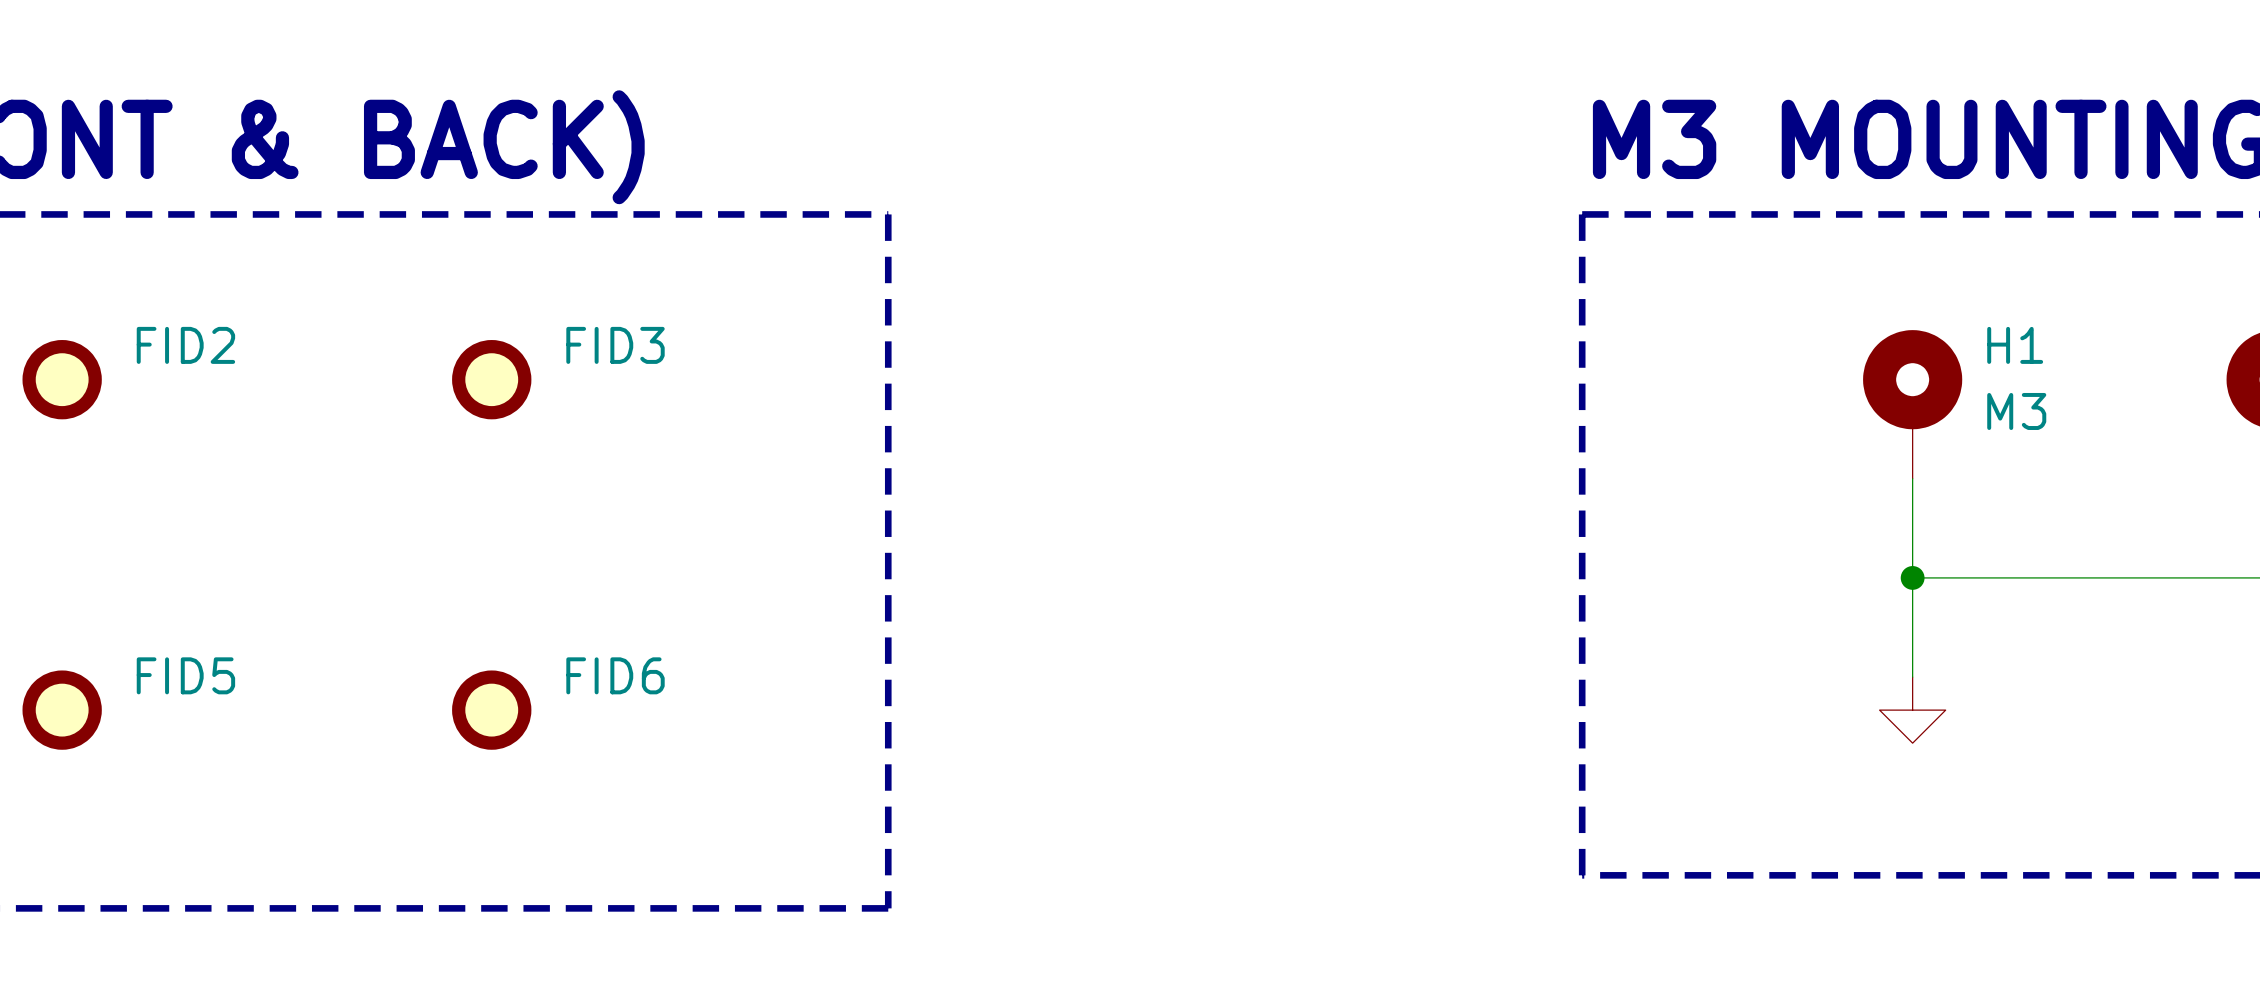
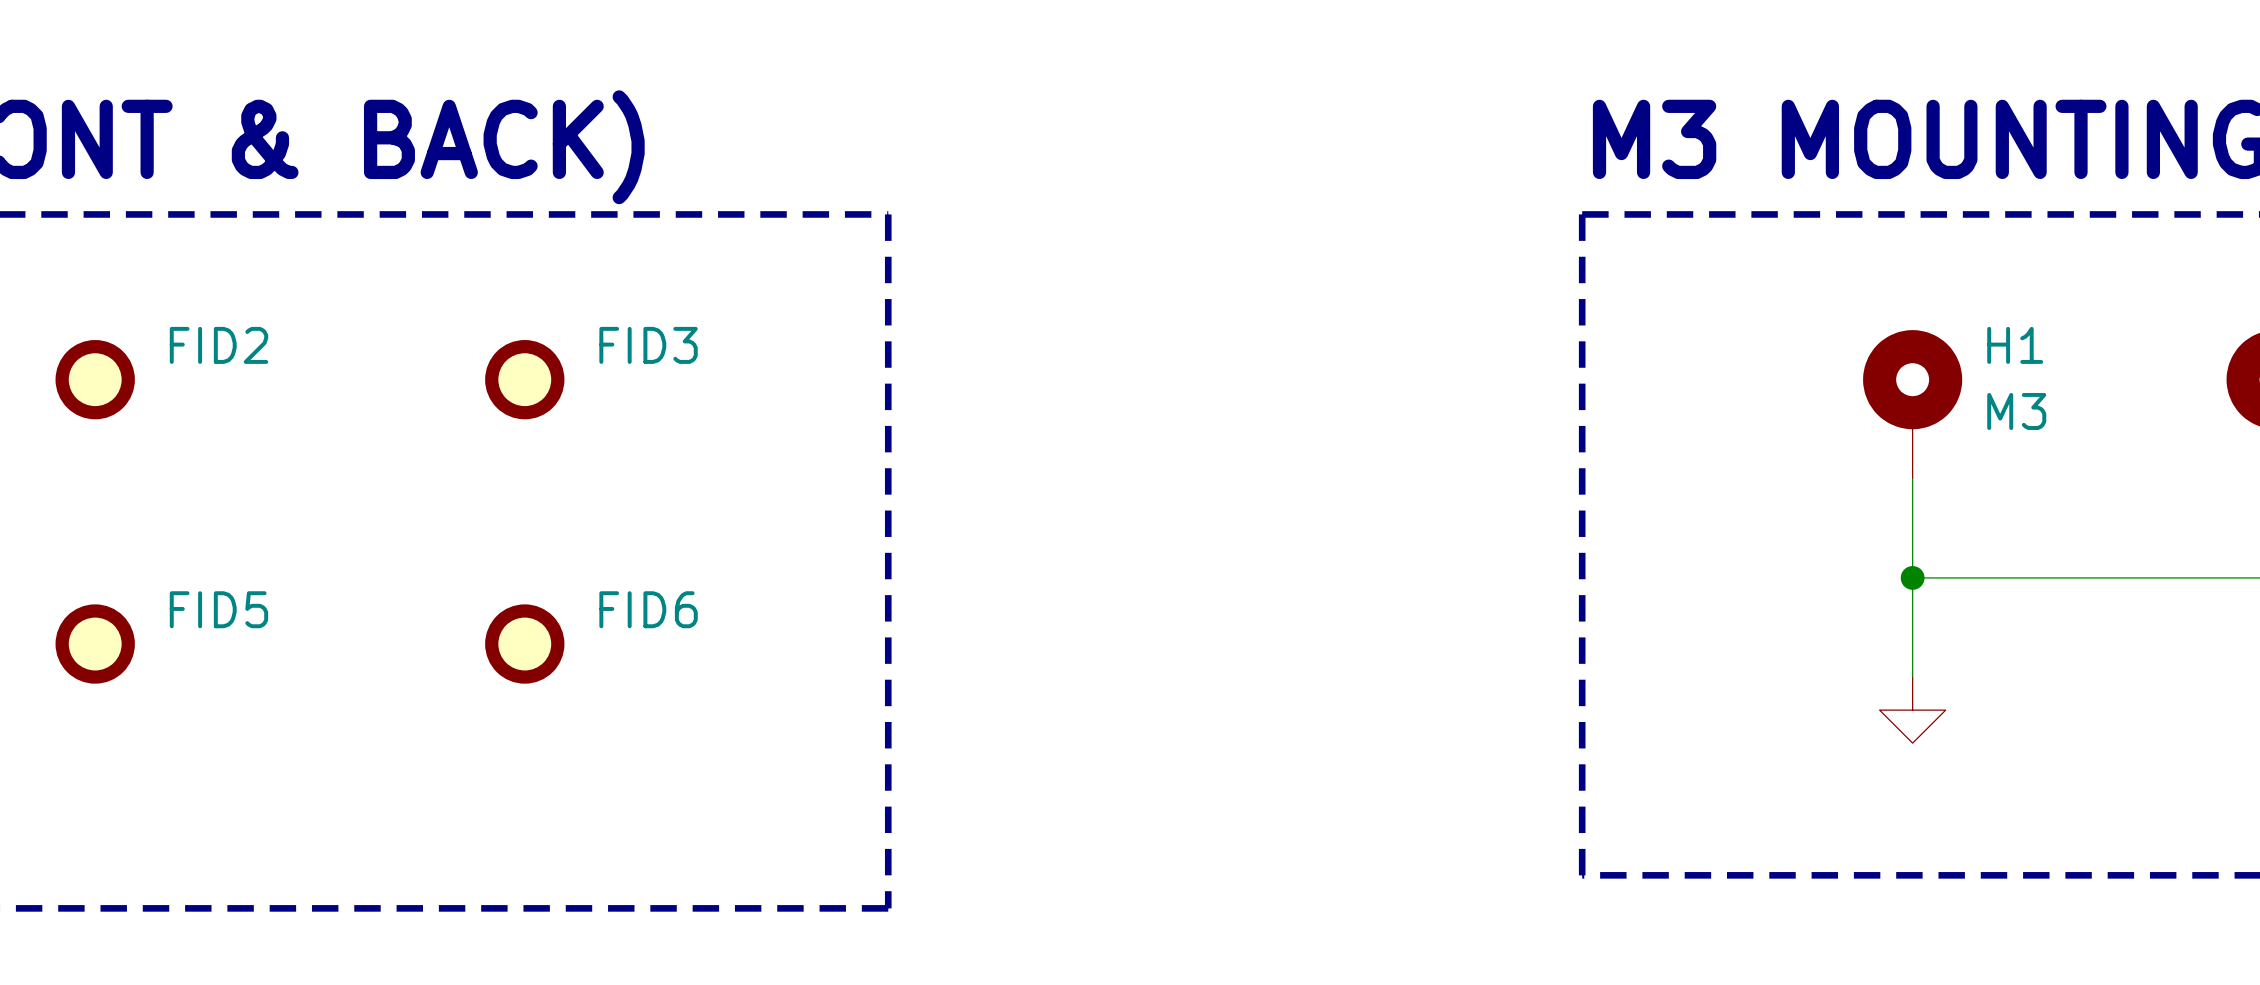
FID2 position: (62, 379) -> (95, 379)
FID3 position: (491, 379) -> (524, 379)
FID5 position: (62, 710) -> (95, 644)
FID6 position: (491, 710) -> (524, 644)

